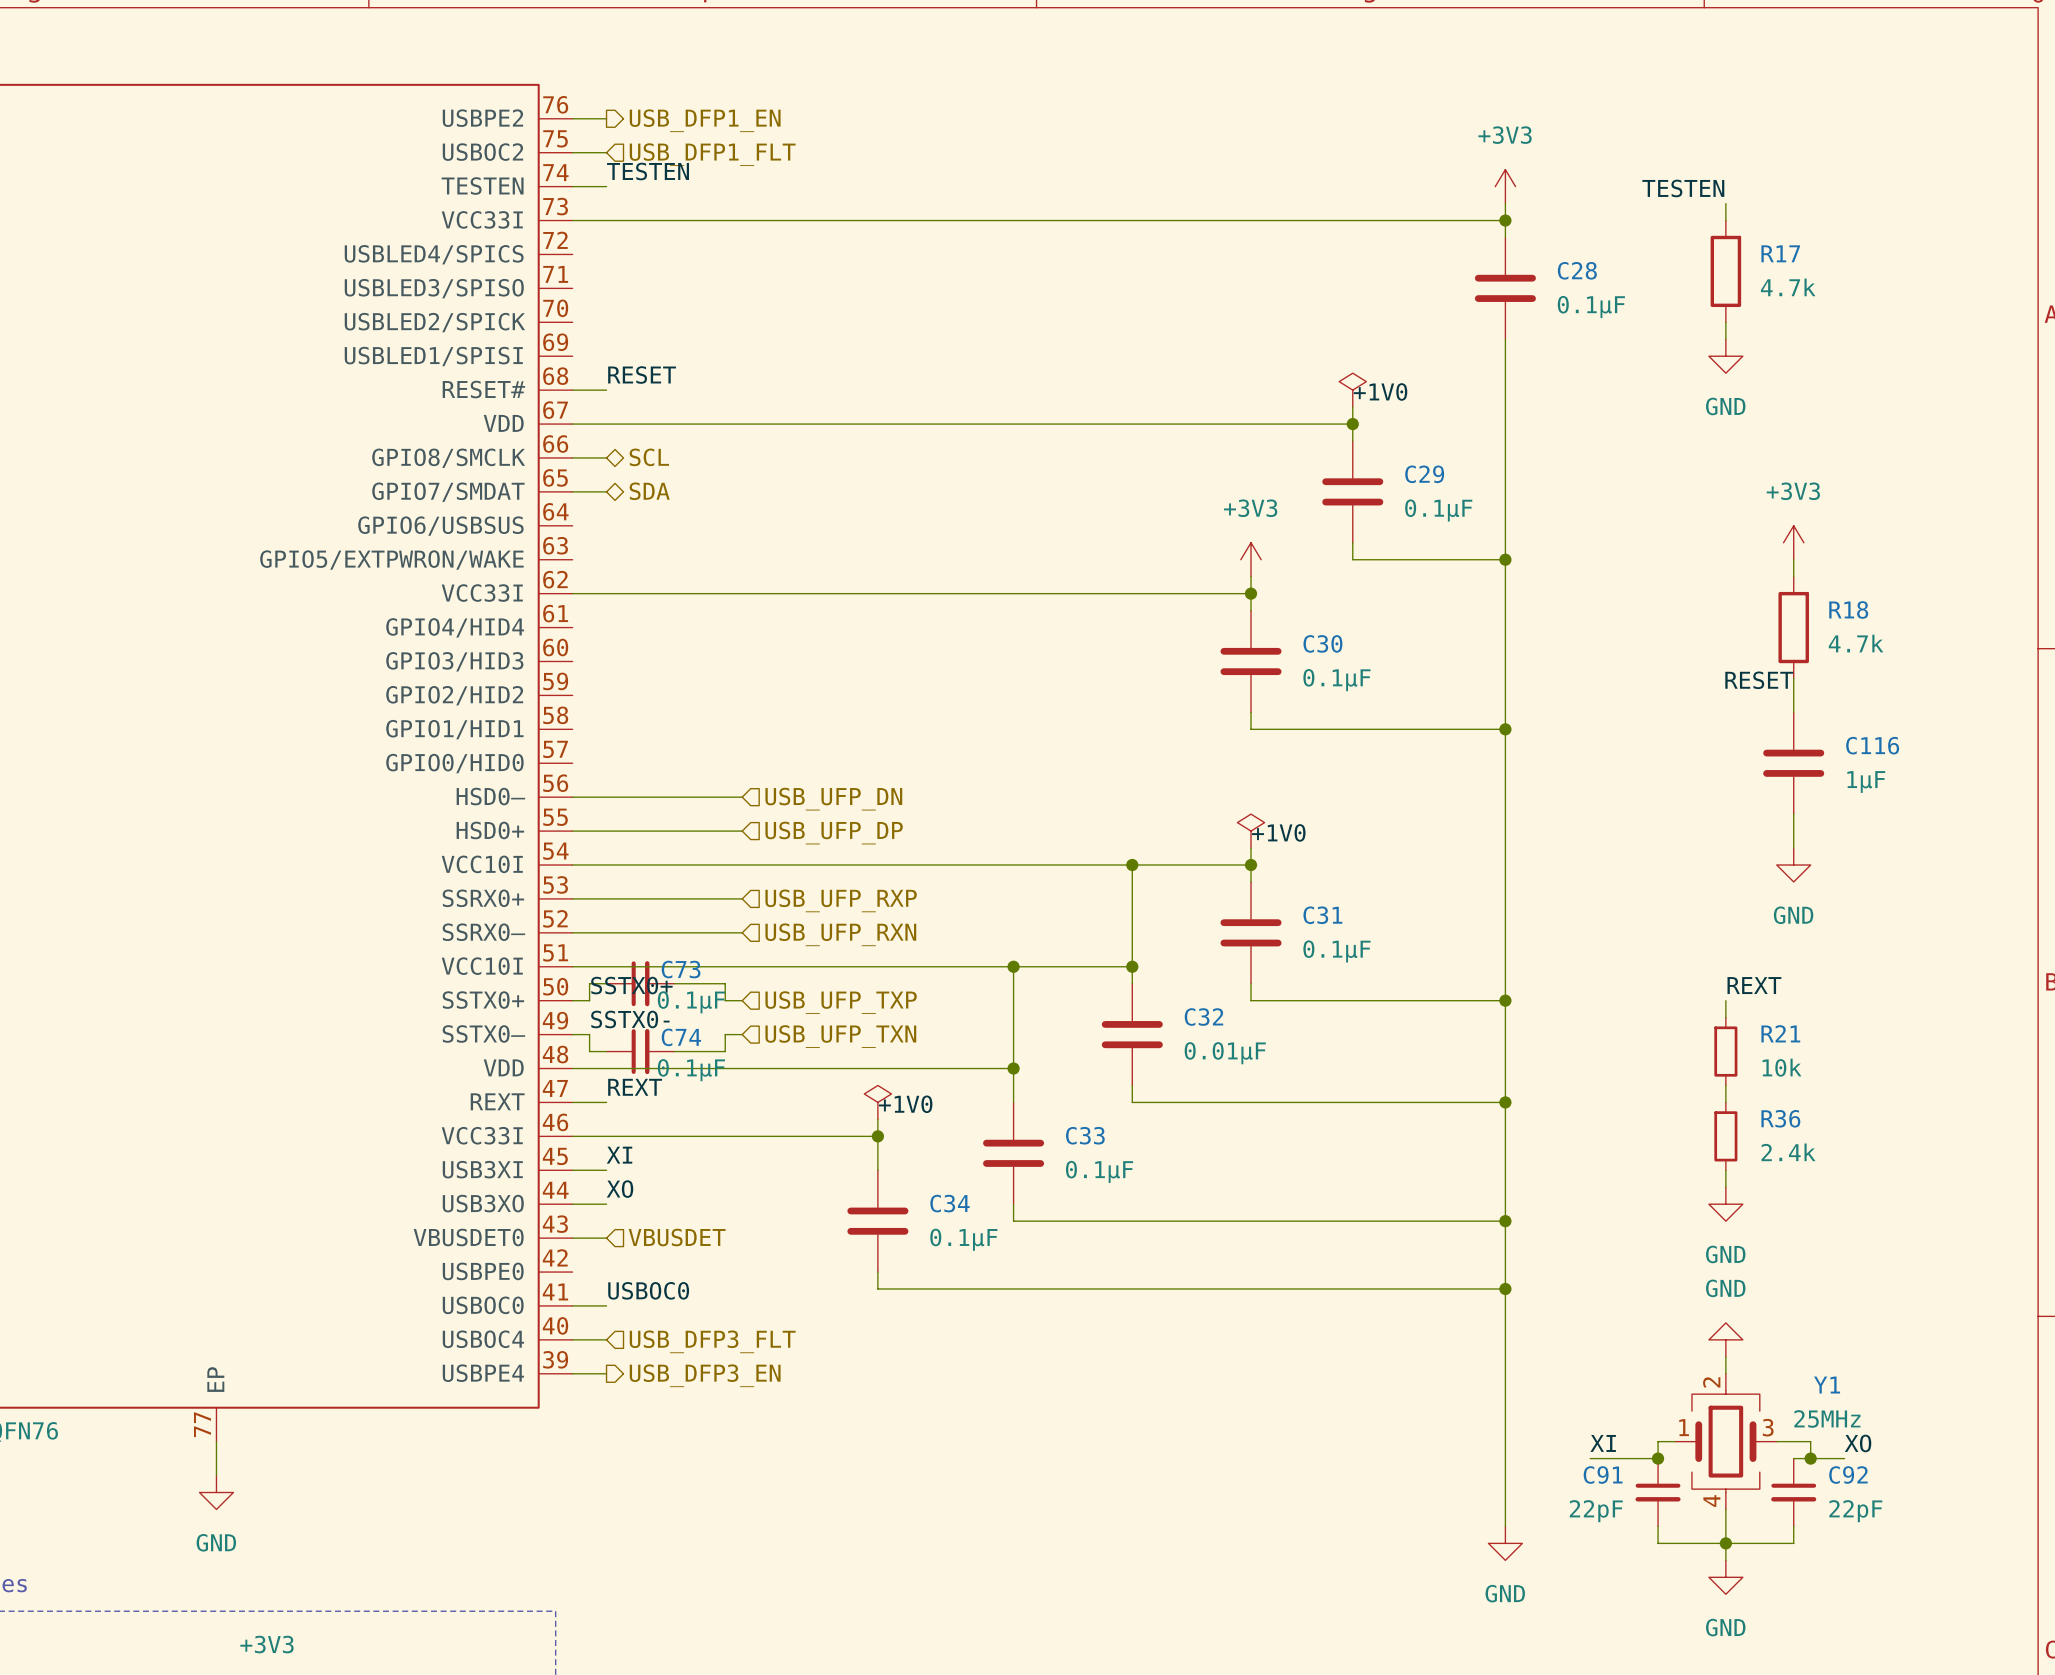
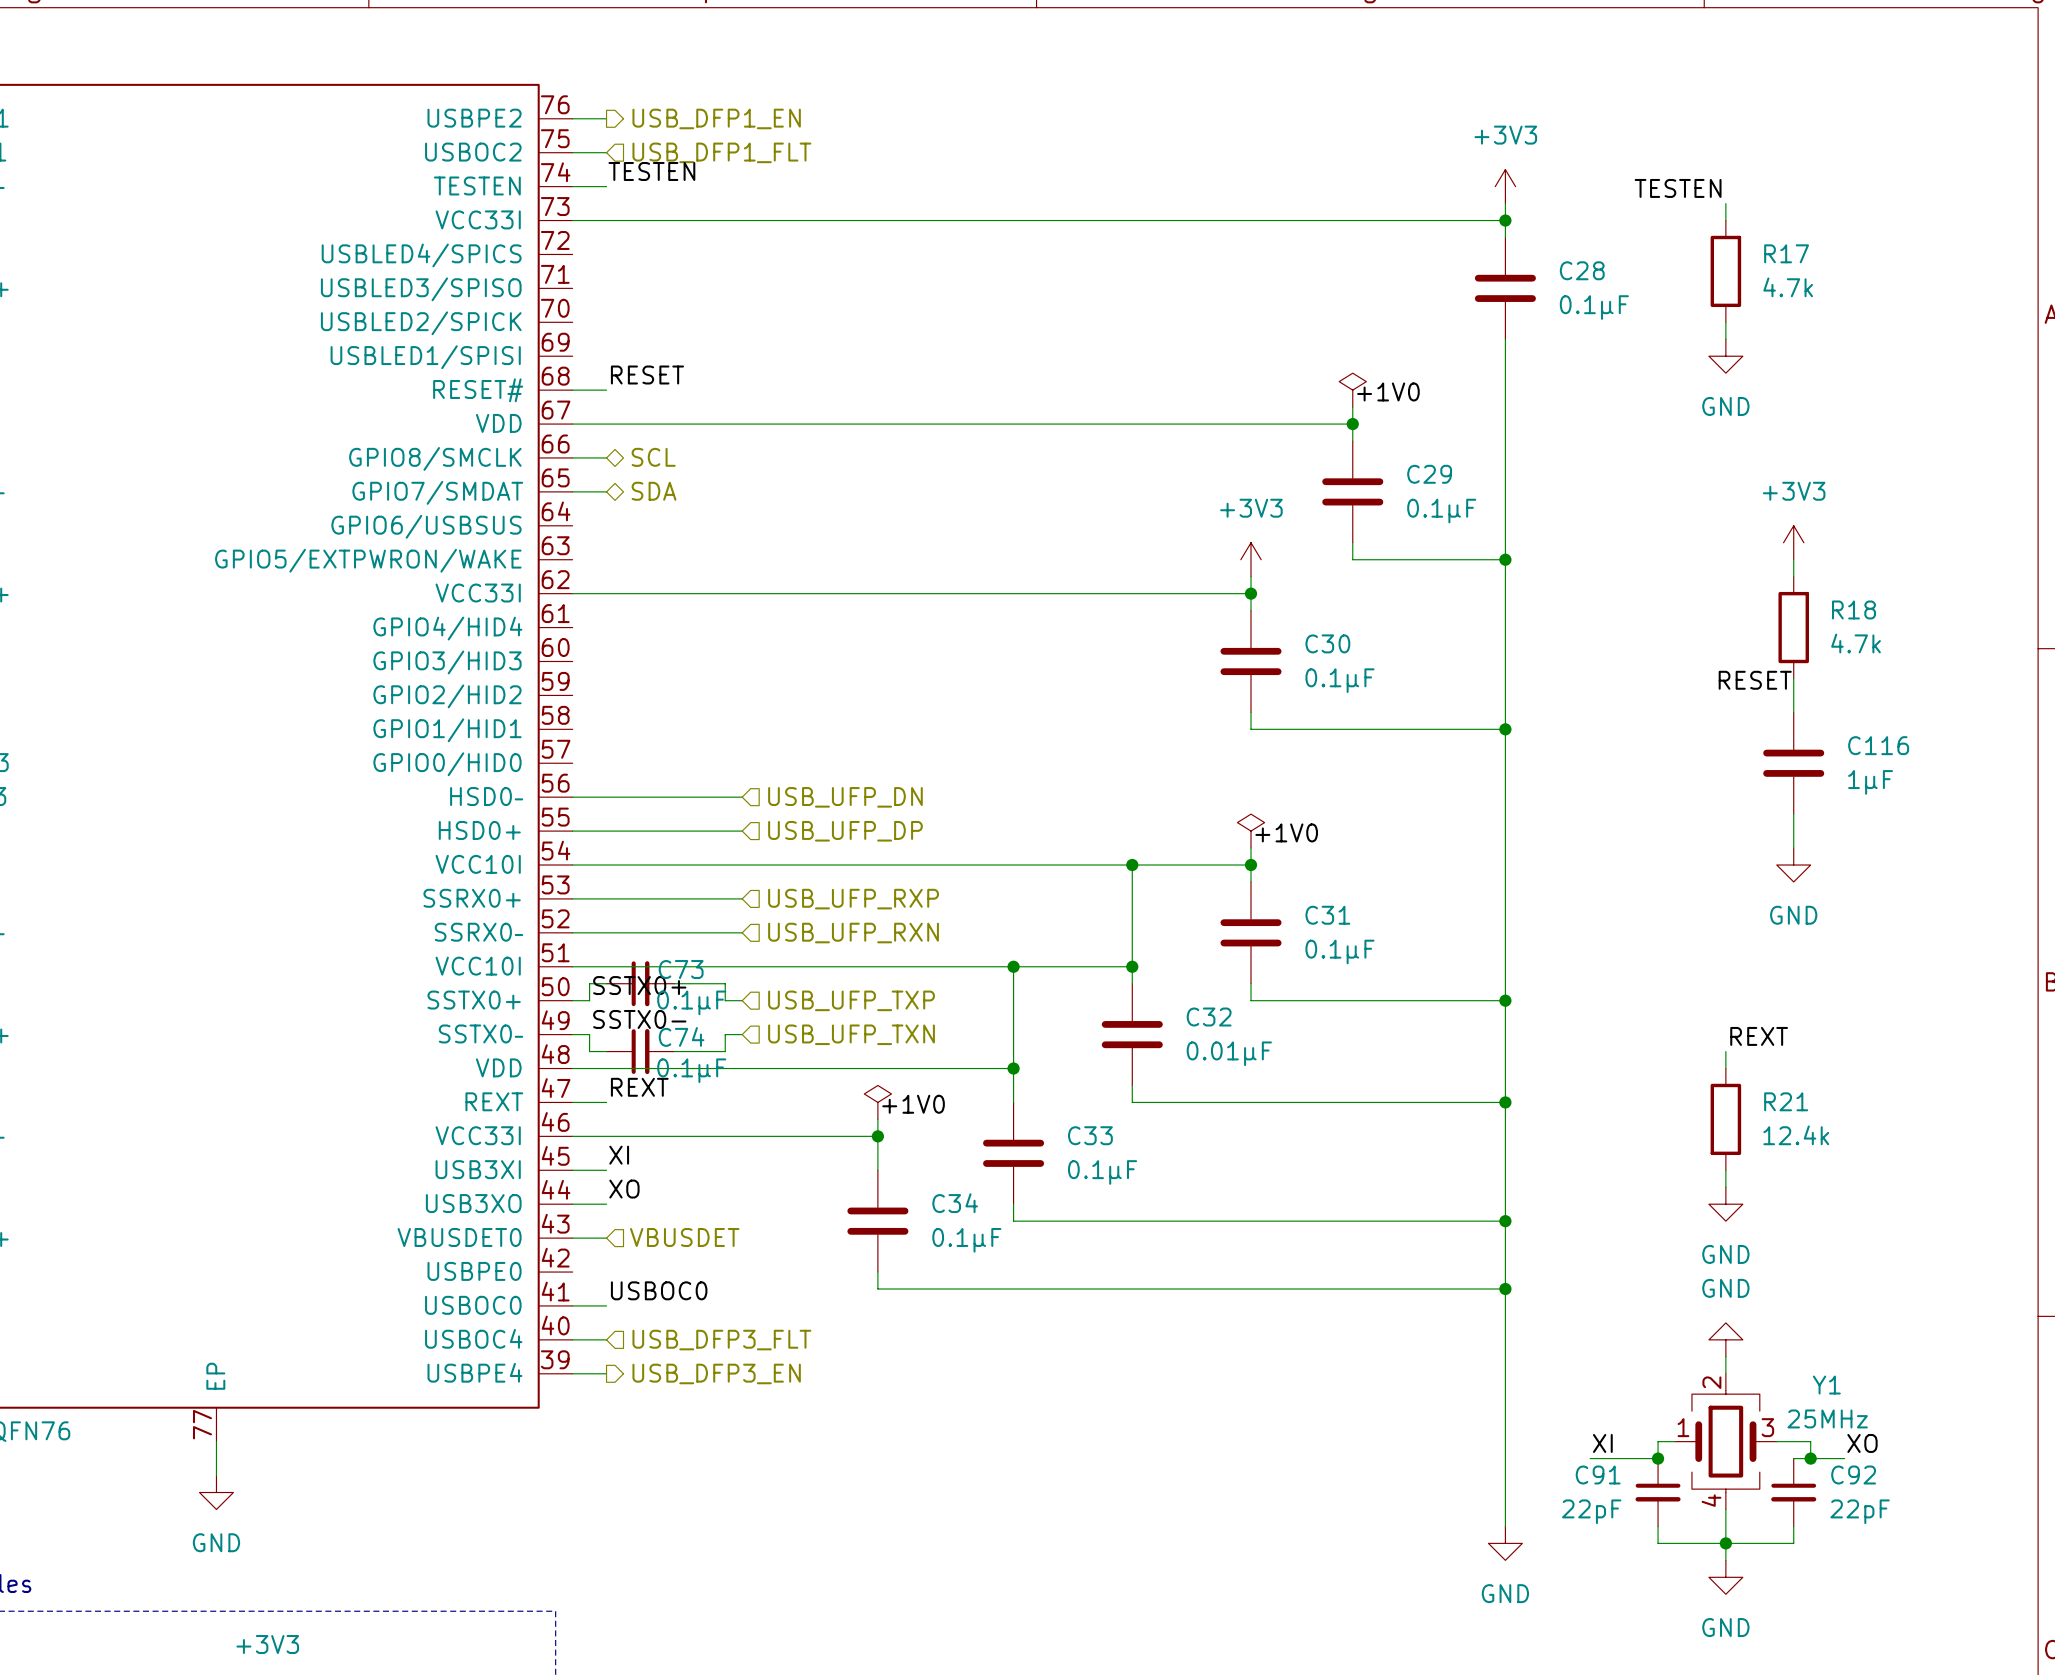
label position: REXT (1754, 985) -> REXT (1759, 1036)
wire: (1725, 1000) (1725, 1017) -> none
R21 symbol: [1714, 1017, 1738, 1086] -> [1710, 1068, 1742, 1171]
R21 value: 10k (1782, 1067) -> 12.4k (1796, 1135)
wire: (1725, 1085) (1725, 1102) -> (1725, 1051) (1725, 1068)
R36: 2.4k (1725, 1136) -> none

